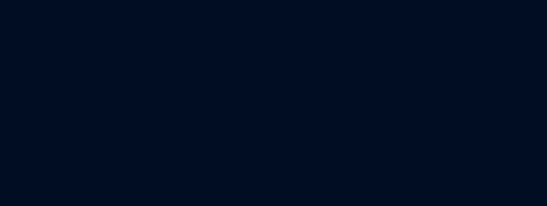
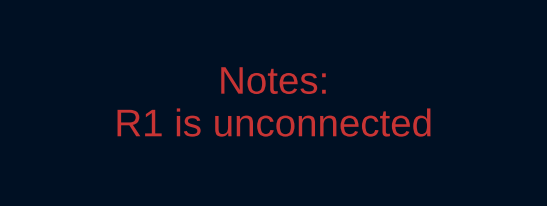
text: none -> Notes: (273, 80)
text: none -> R1 is unconnected (274, 122)

